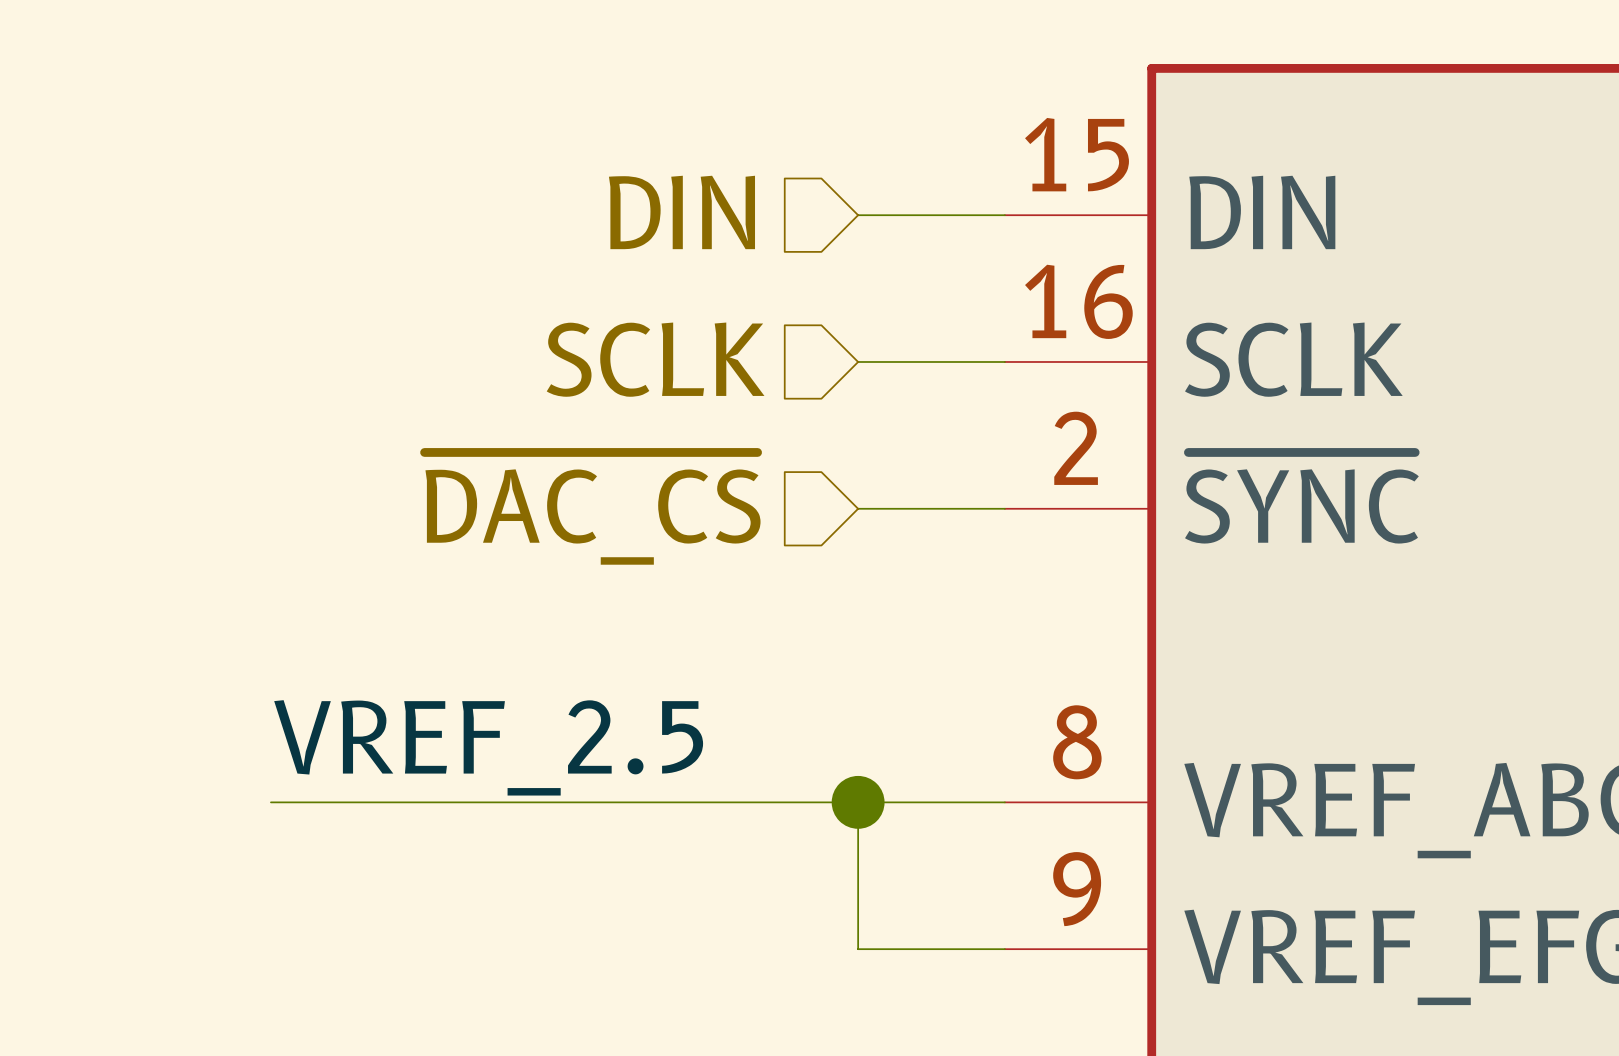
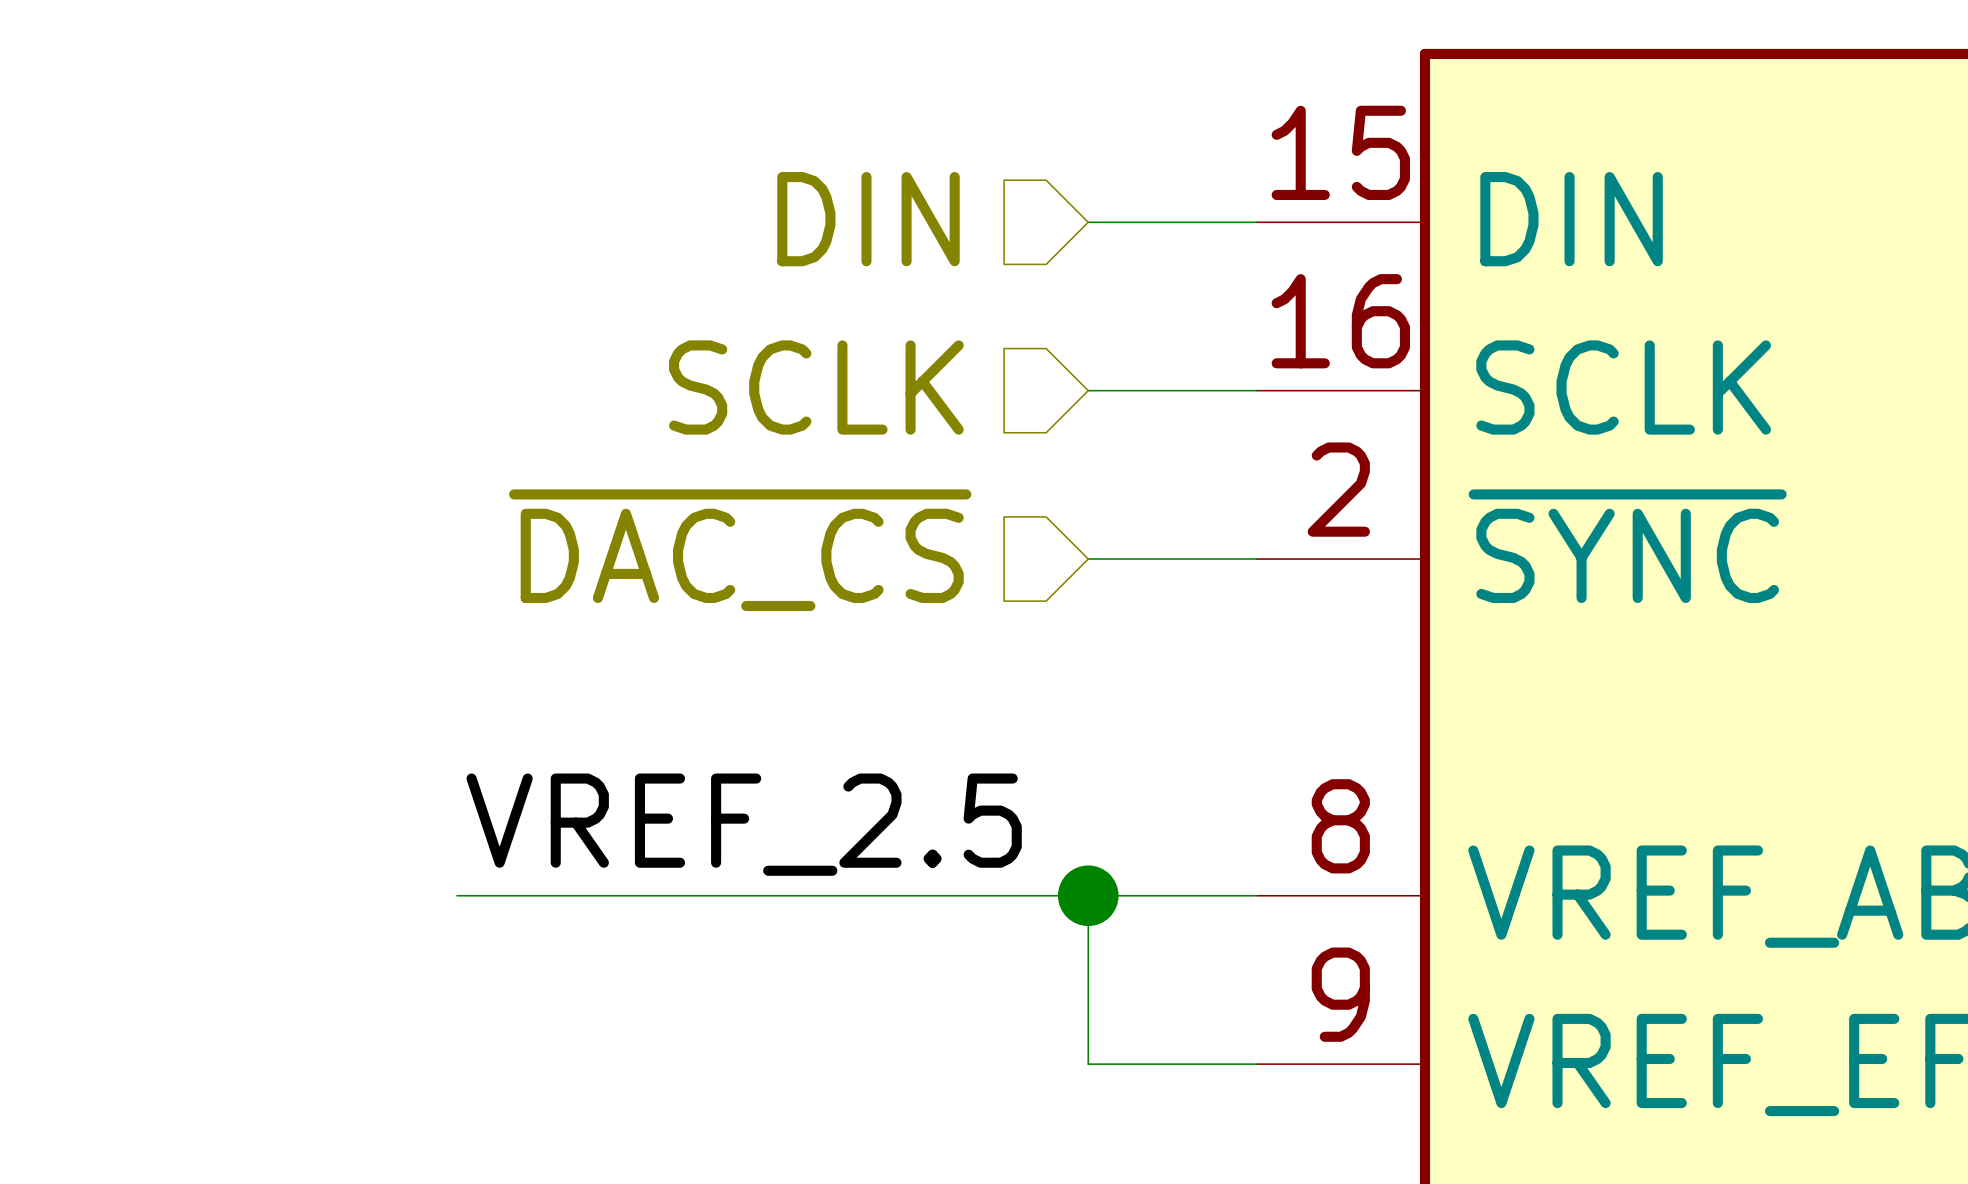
label position: VREF_2.5 (488, 747) -> VREF_2.5 (744, 824)
wire: (270, 802) (307, 802) -> none

